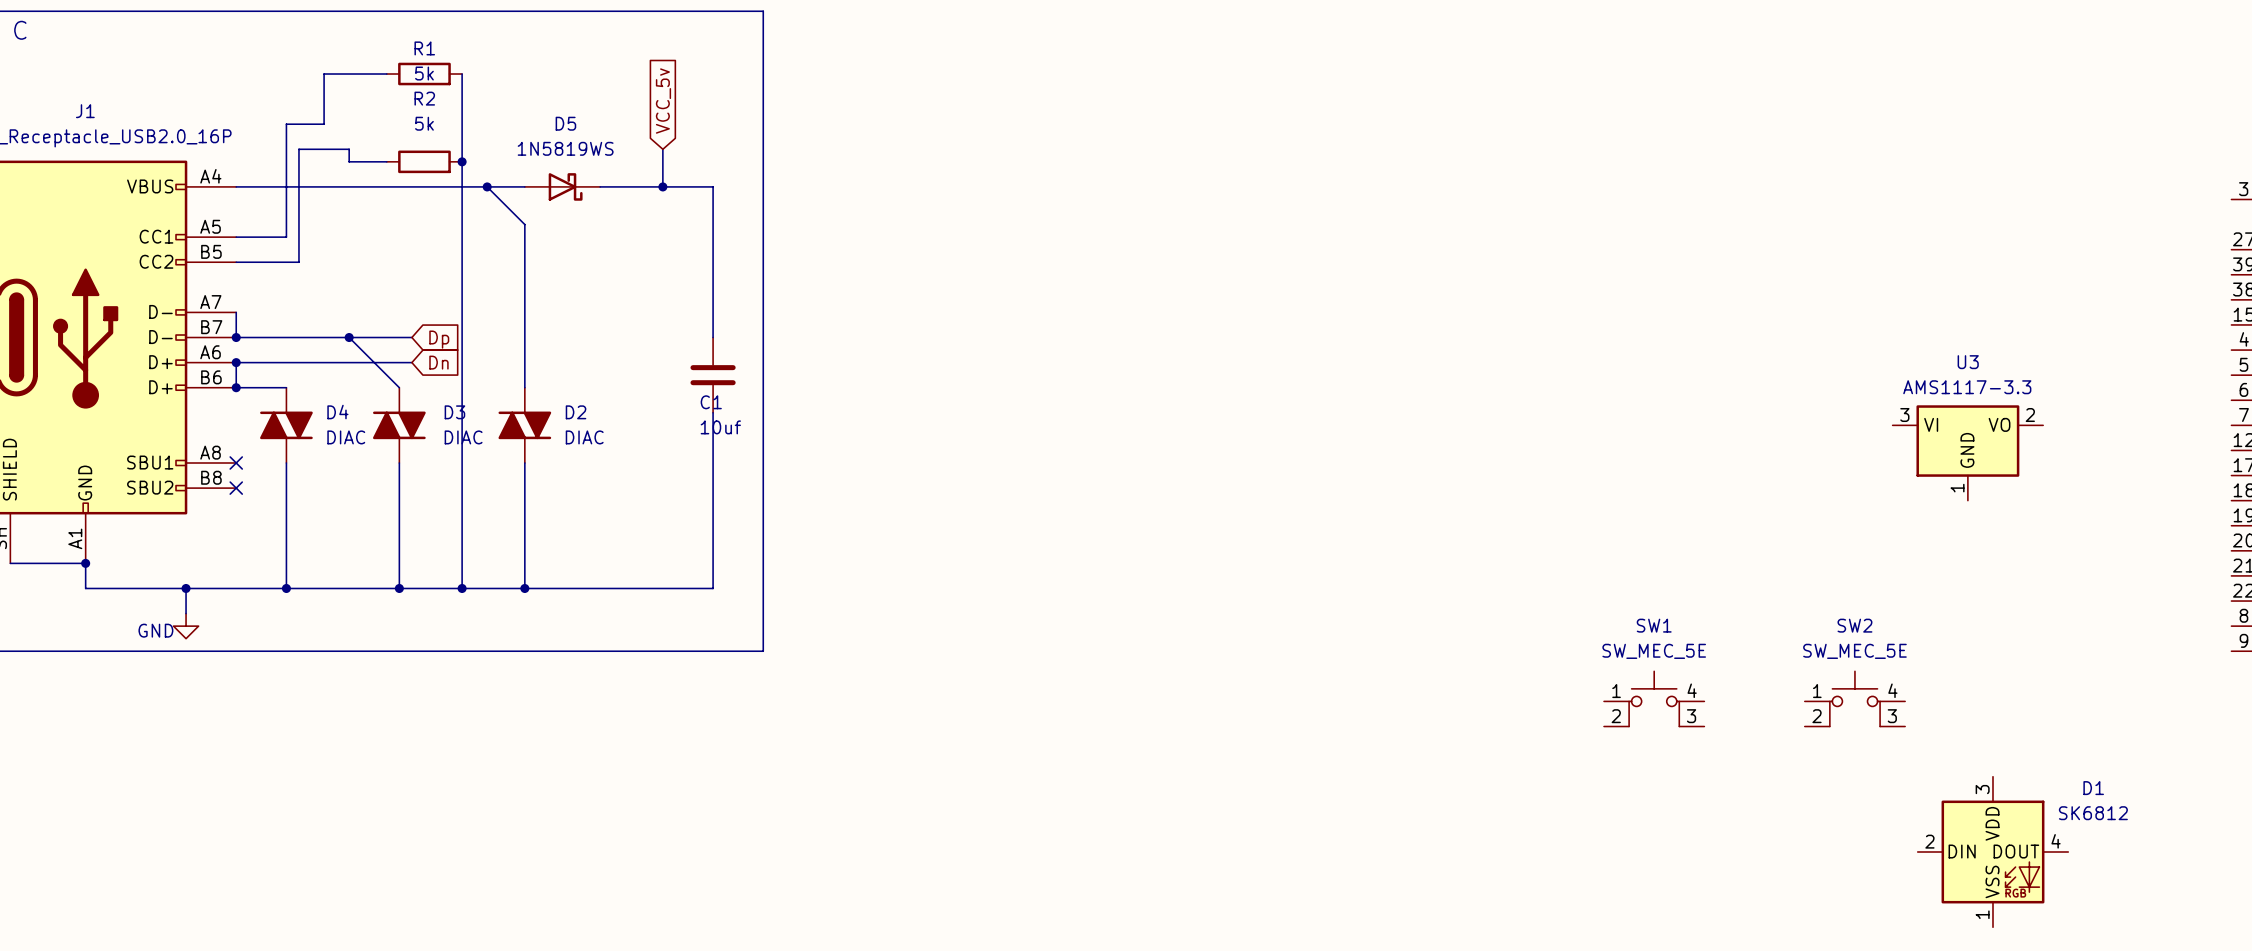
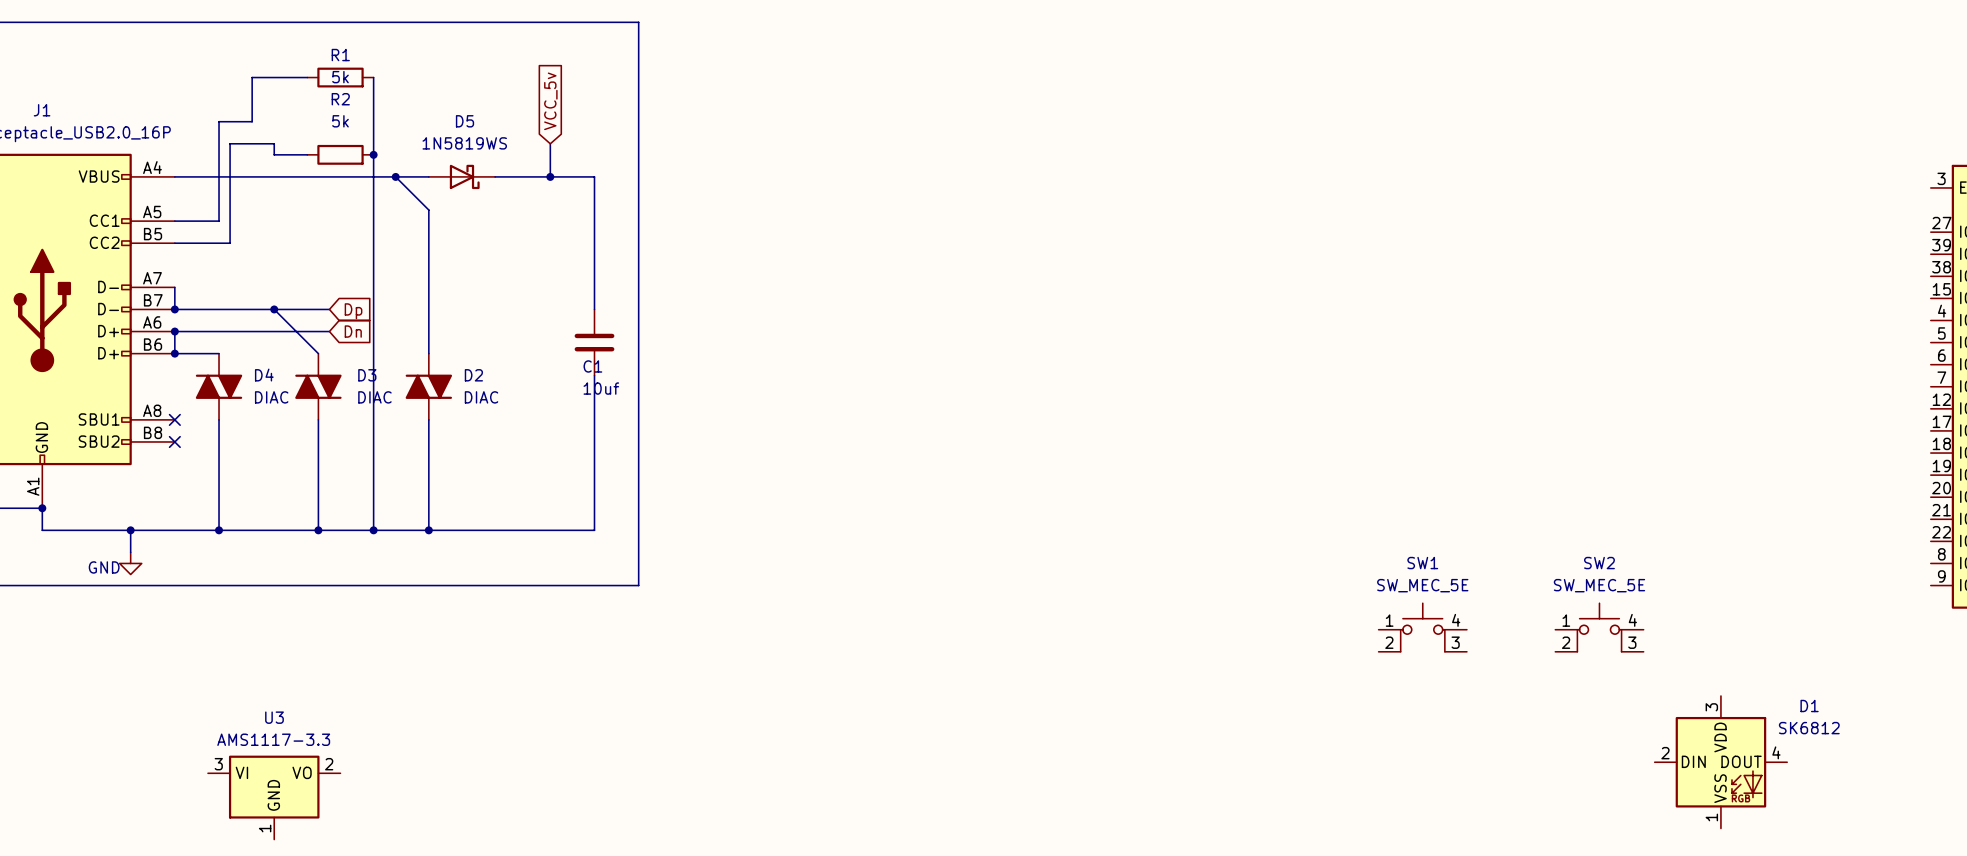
U3 position: (1967, 452) -> (274, 797)

